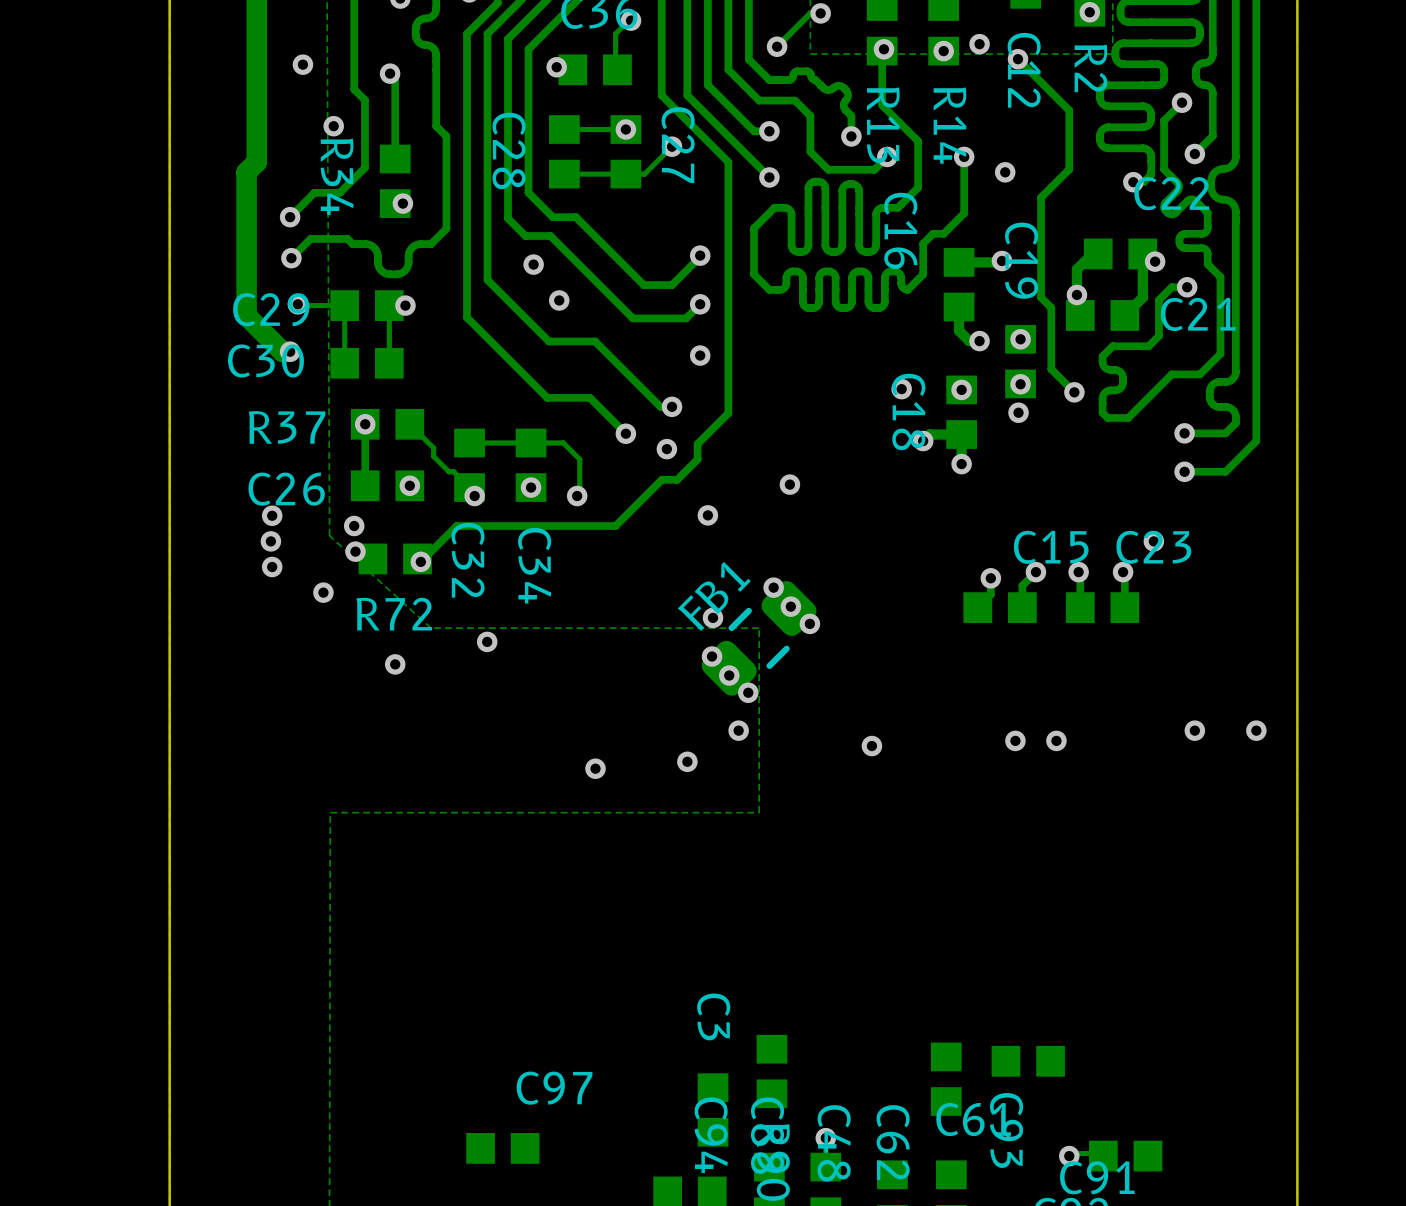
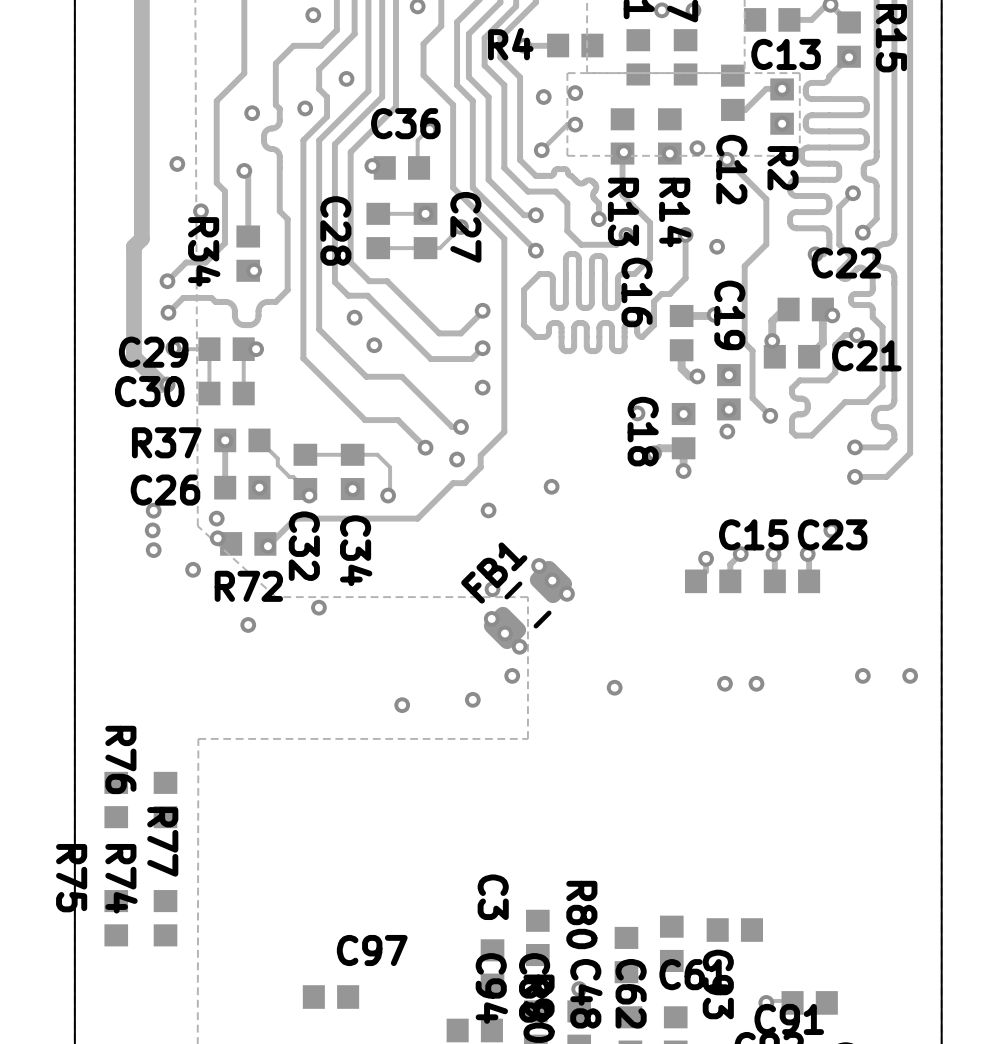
R77: none -> (116, 800)
R76: none -> (165, 800)
R75: none -> (116, 918)
R74: none -> (165, 918)
R80: none -> (626, 955)

